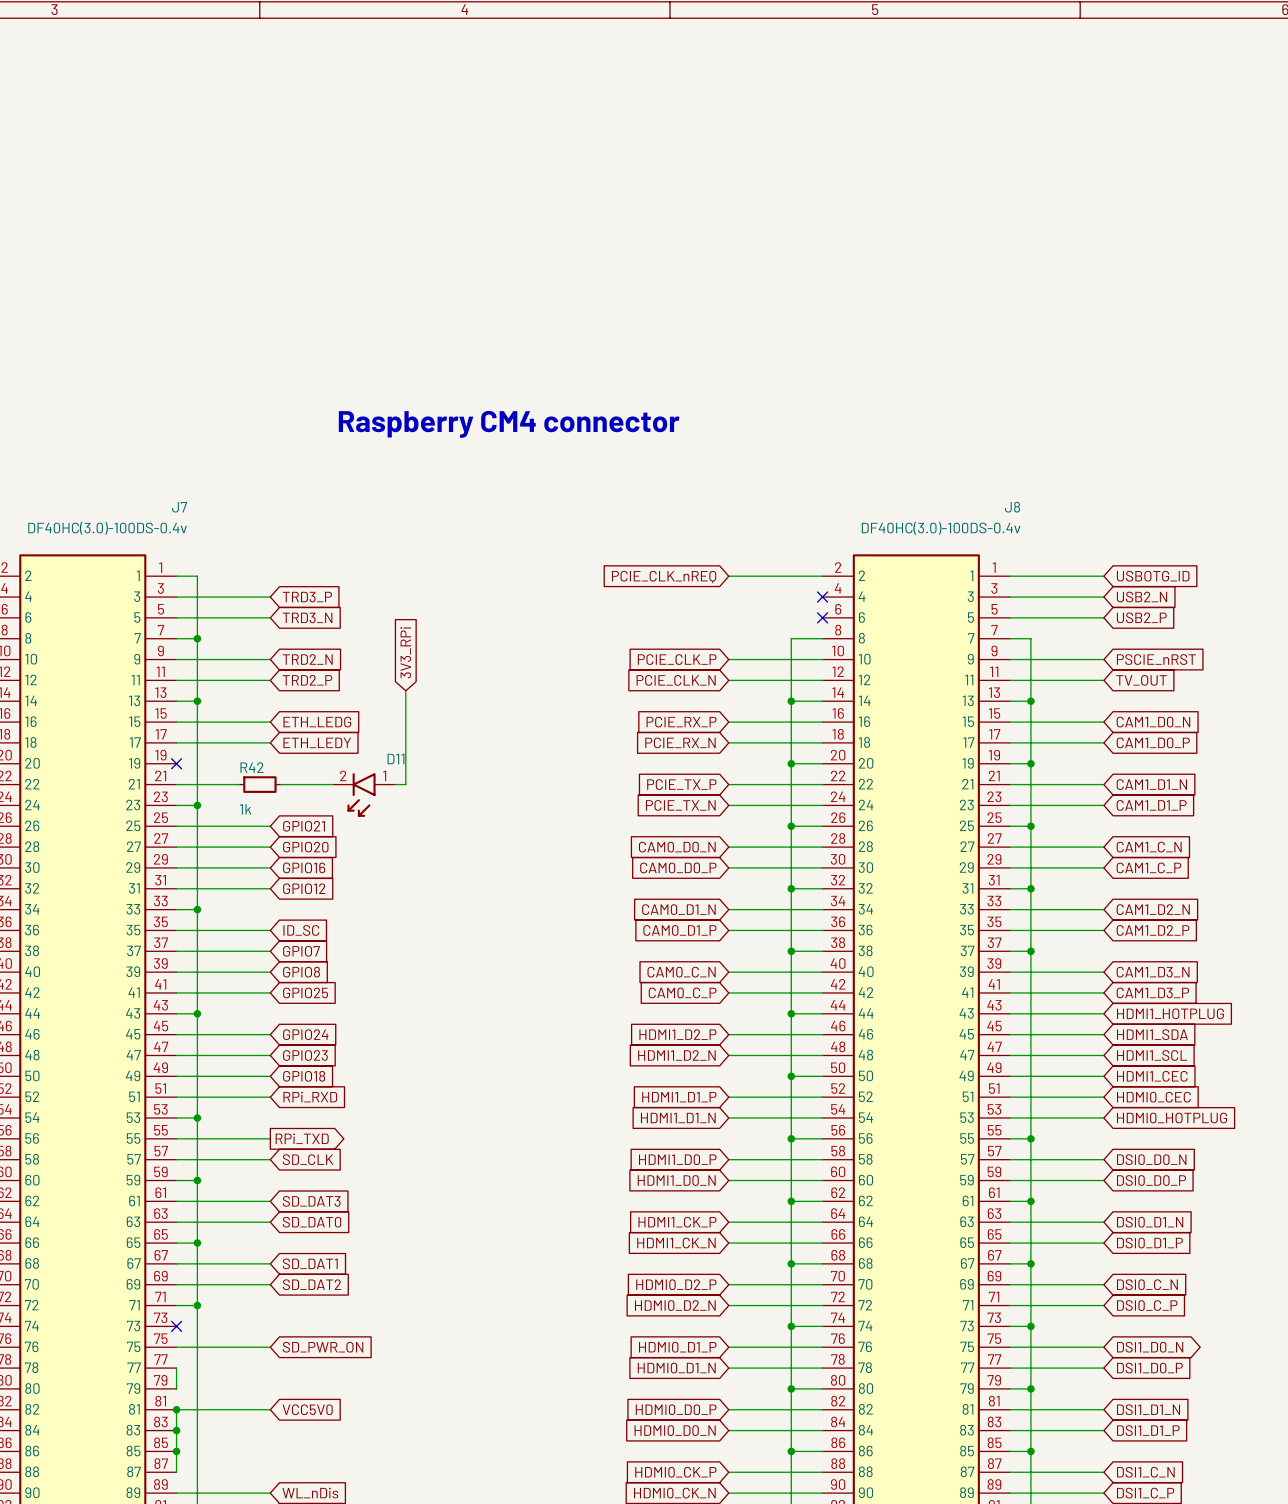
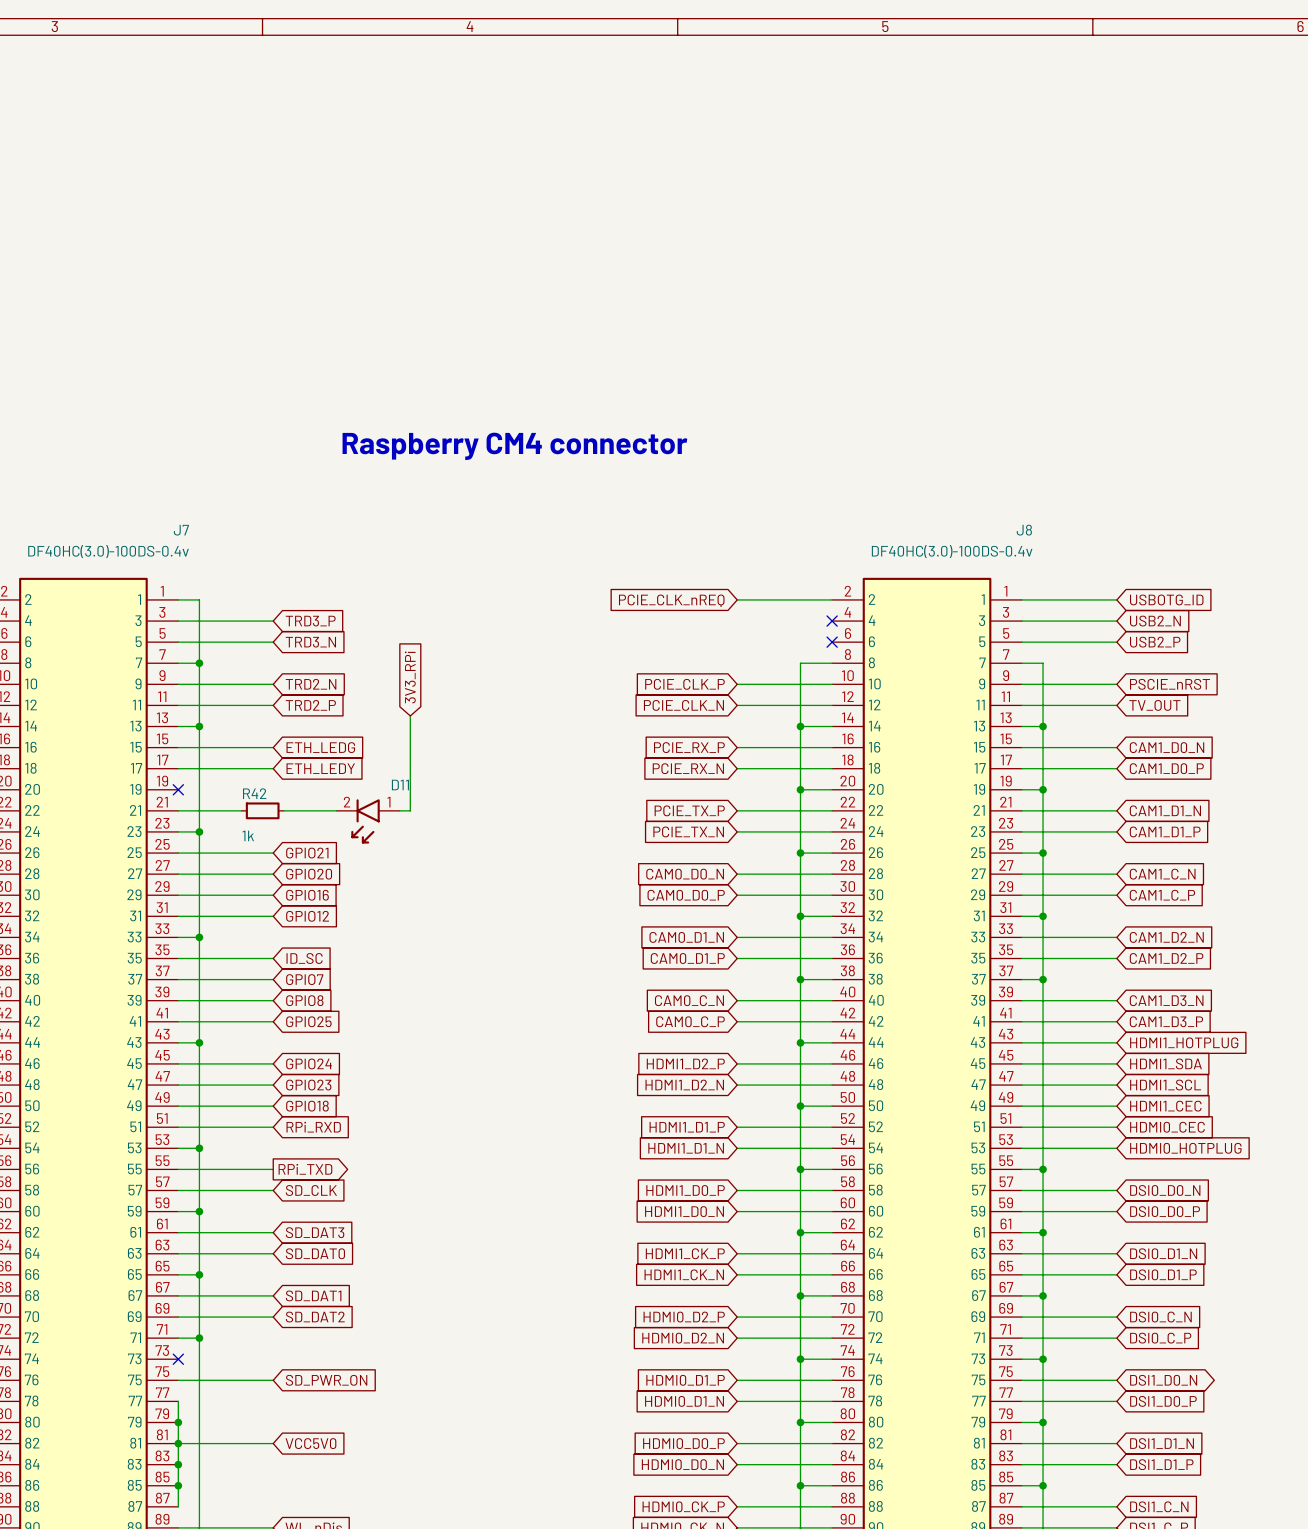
wire: none -> (178, 1422) (178, 1443)
junction: none -> (178, 1422)

